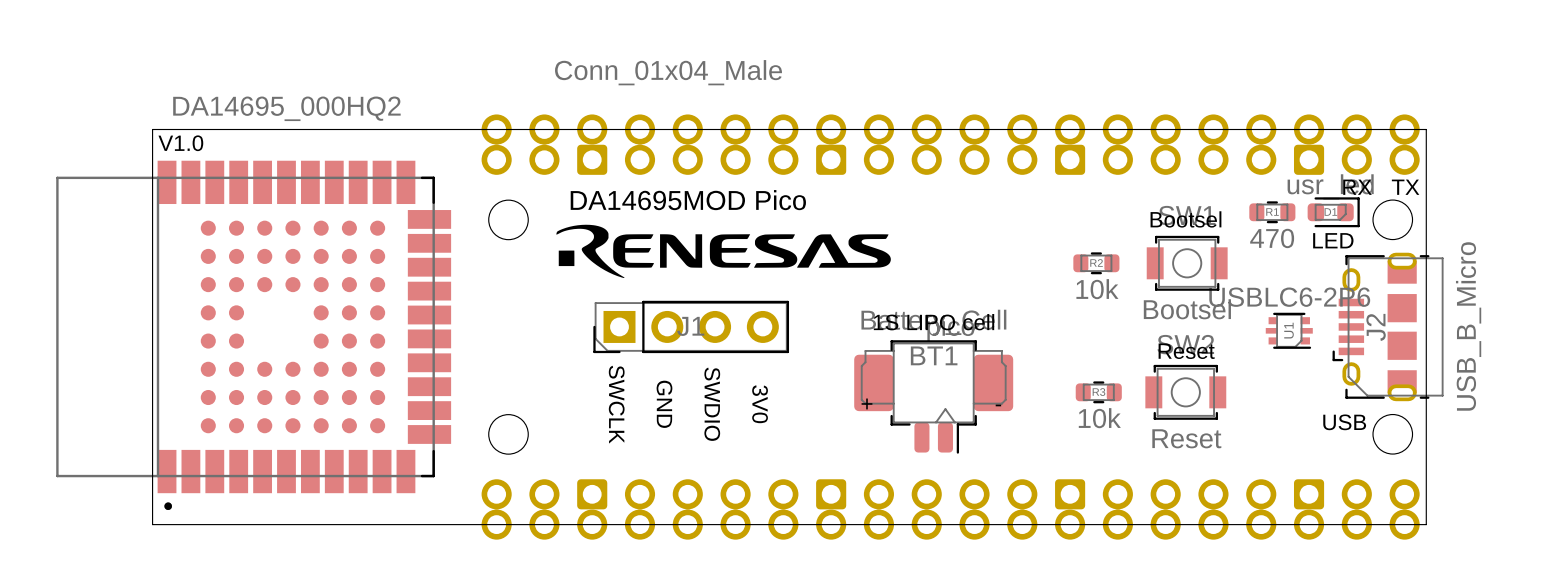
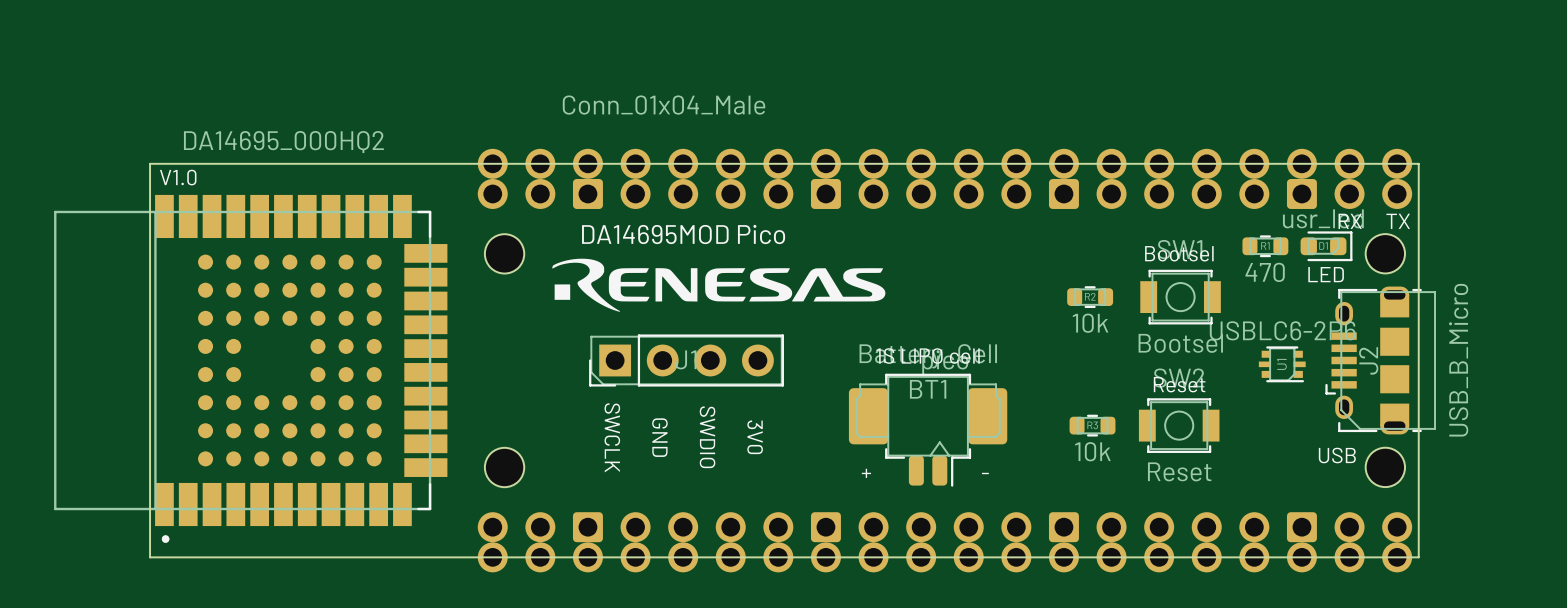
text position: + (867, 403) -> + (866, 473)
text position: - (998, 405) -> - (985, 473)

